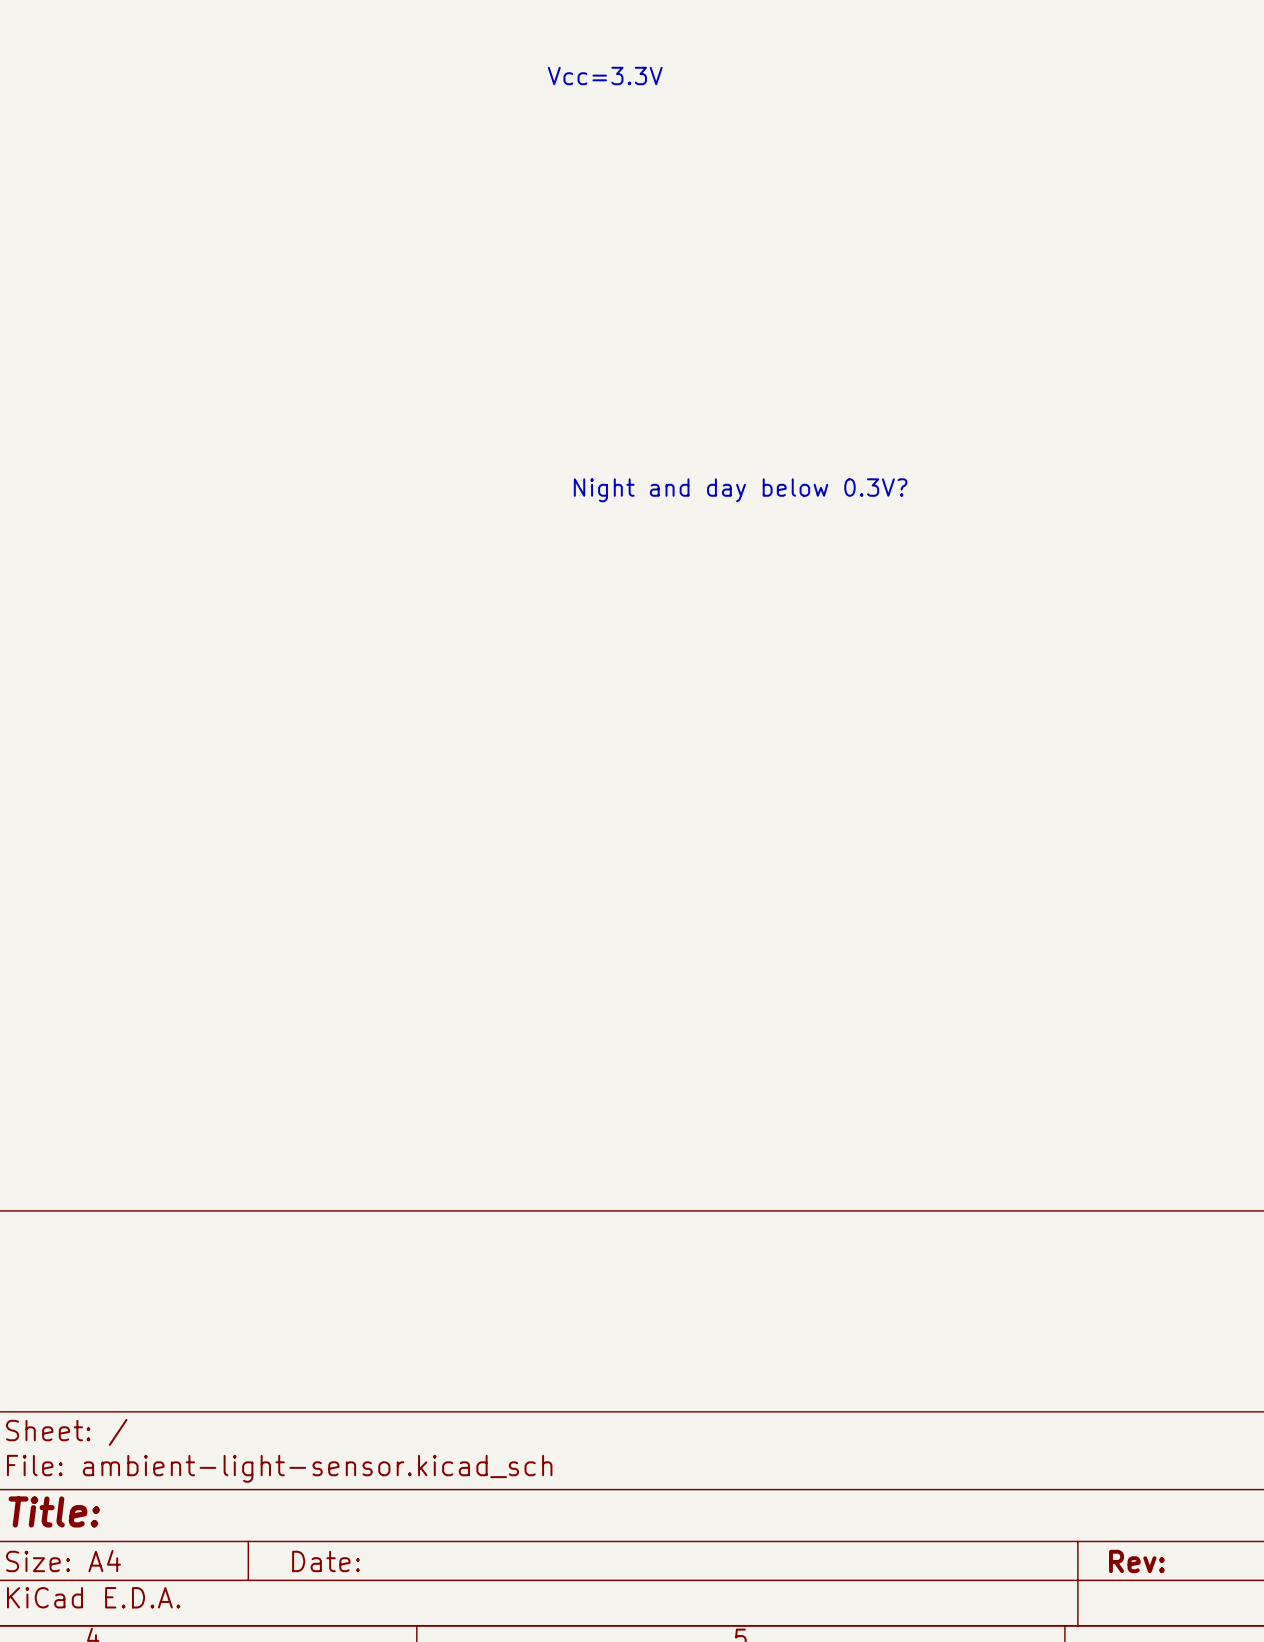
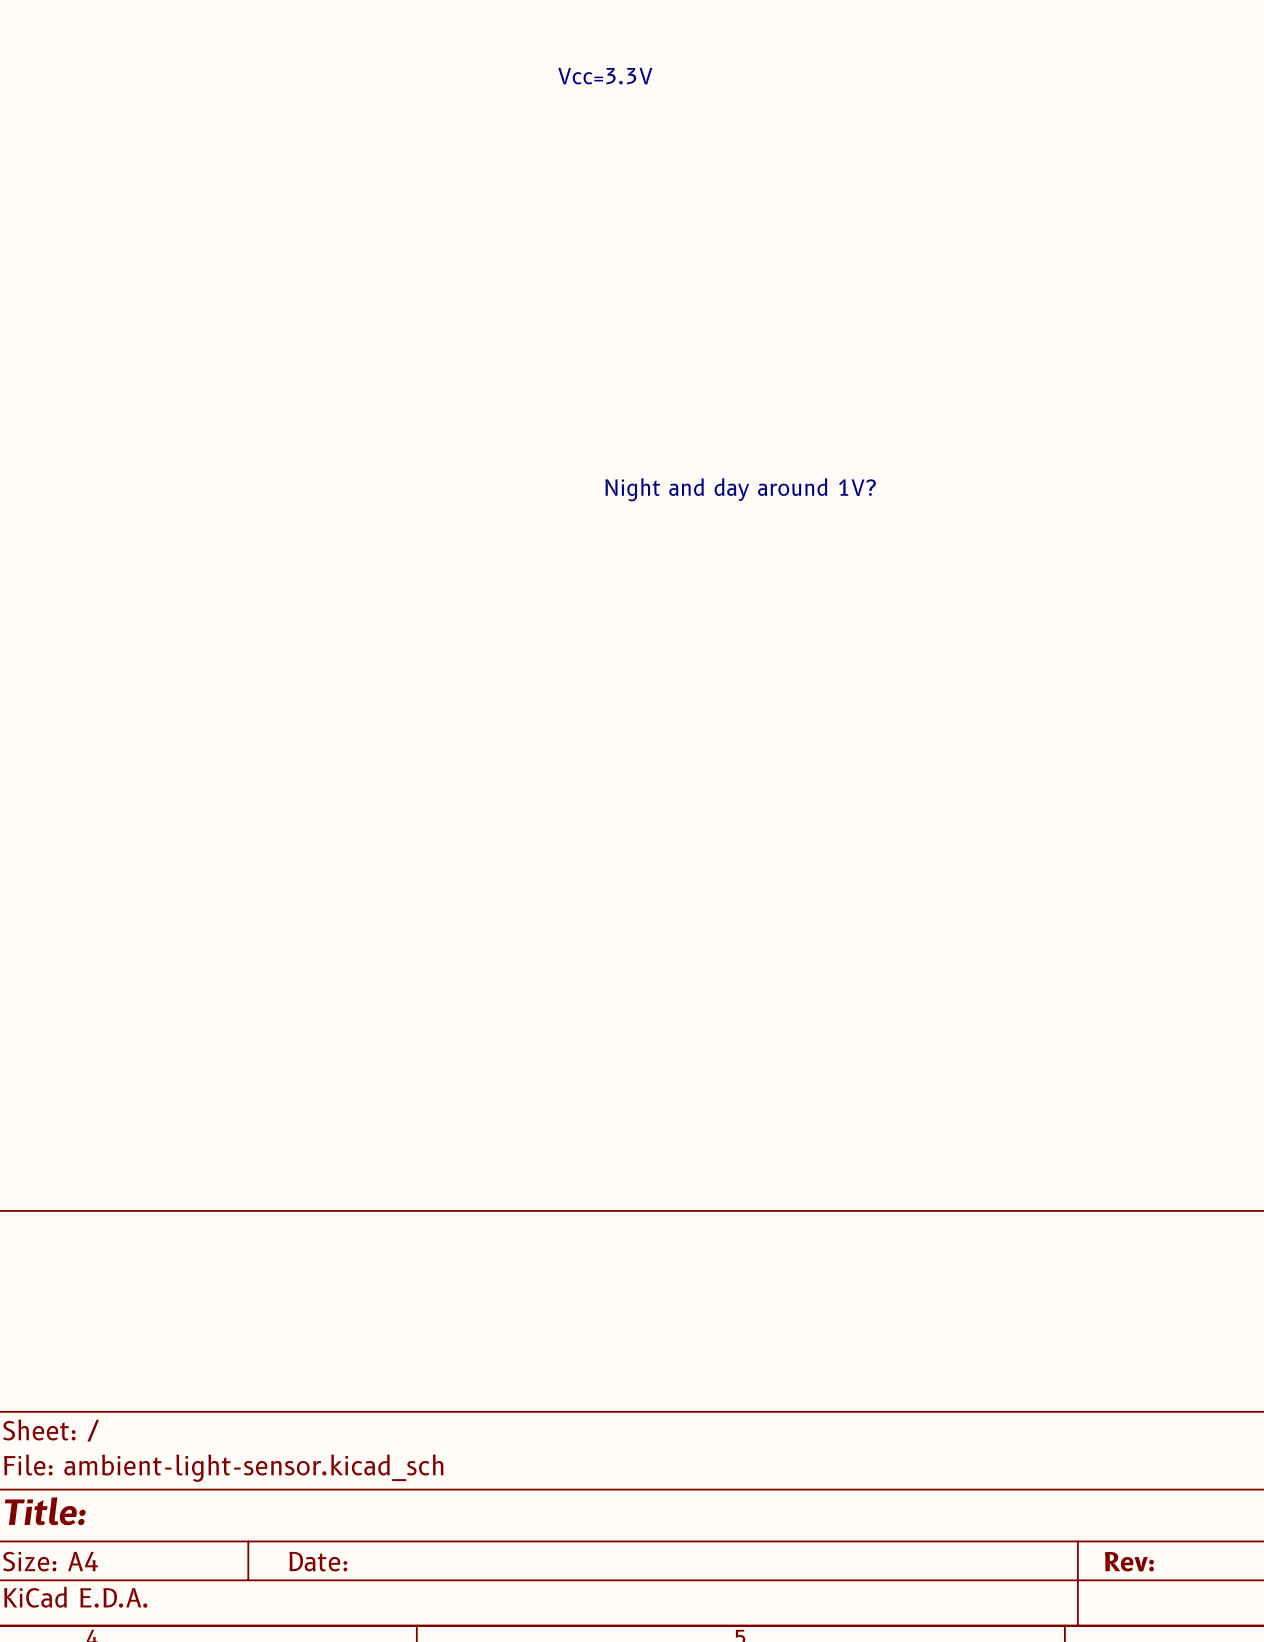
text: Night and day below 0.3V? (740, 490) -> Night and day around 1V? (740, 489)

